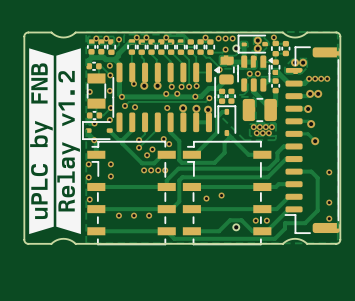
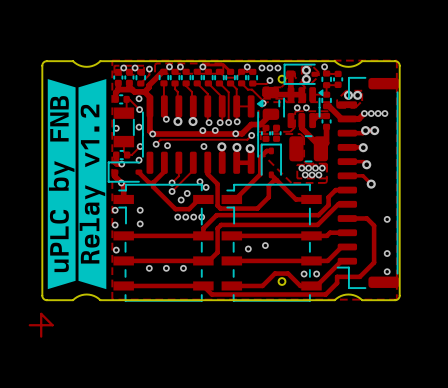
track: none -> (29, 325) (52, 325) (41, 313) (41, 336)

